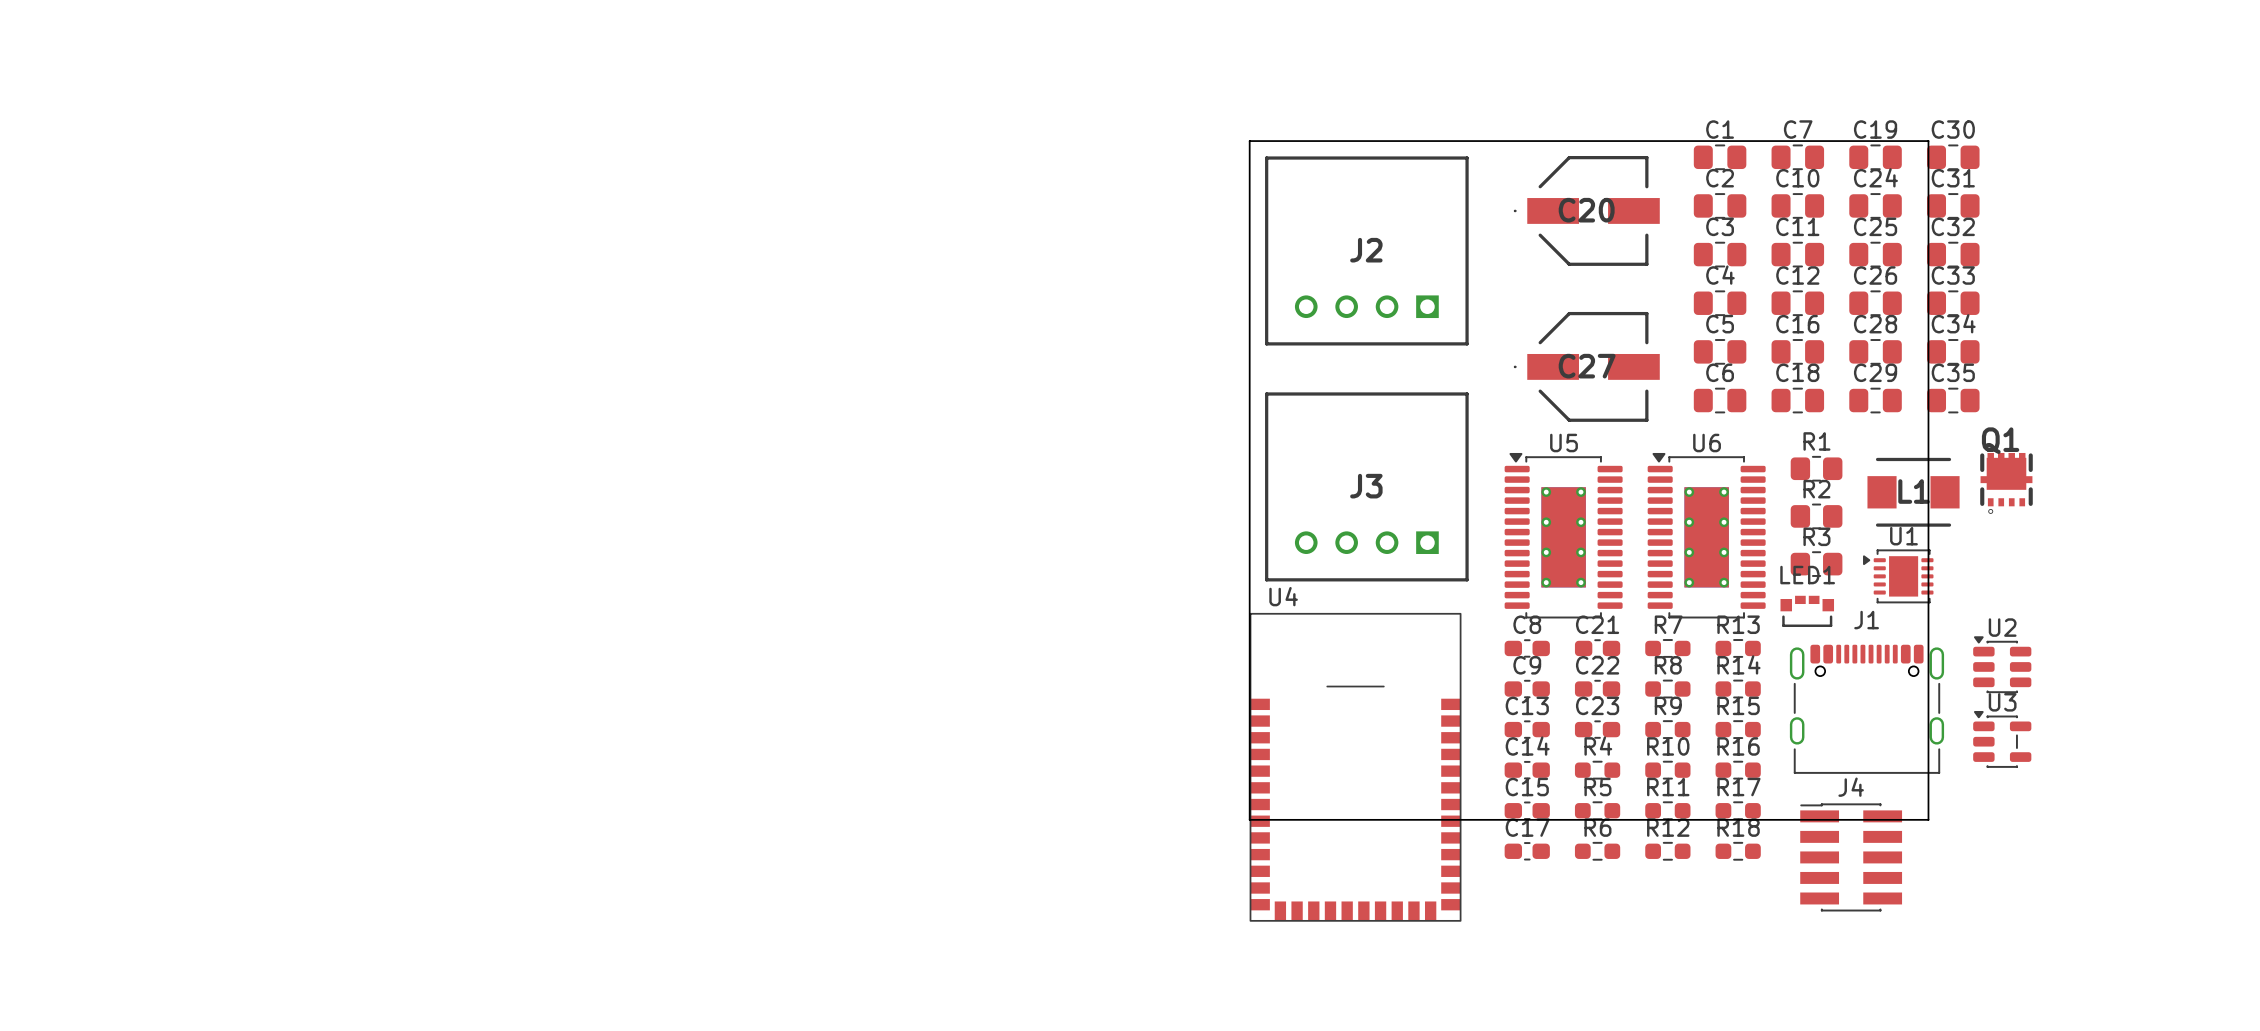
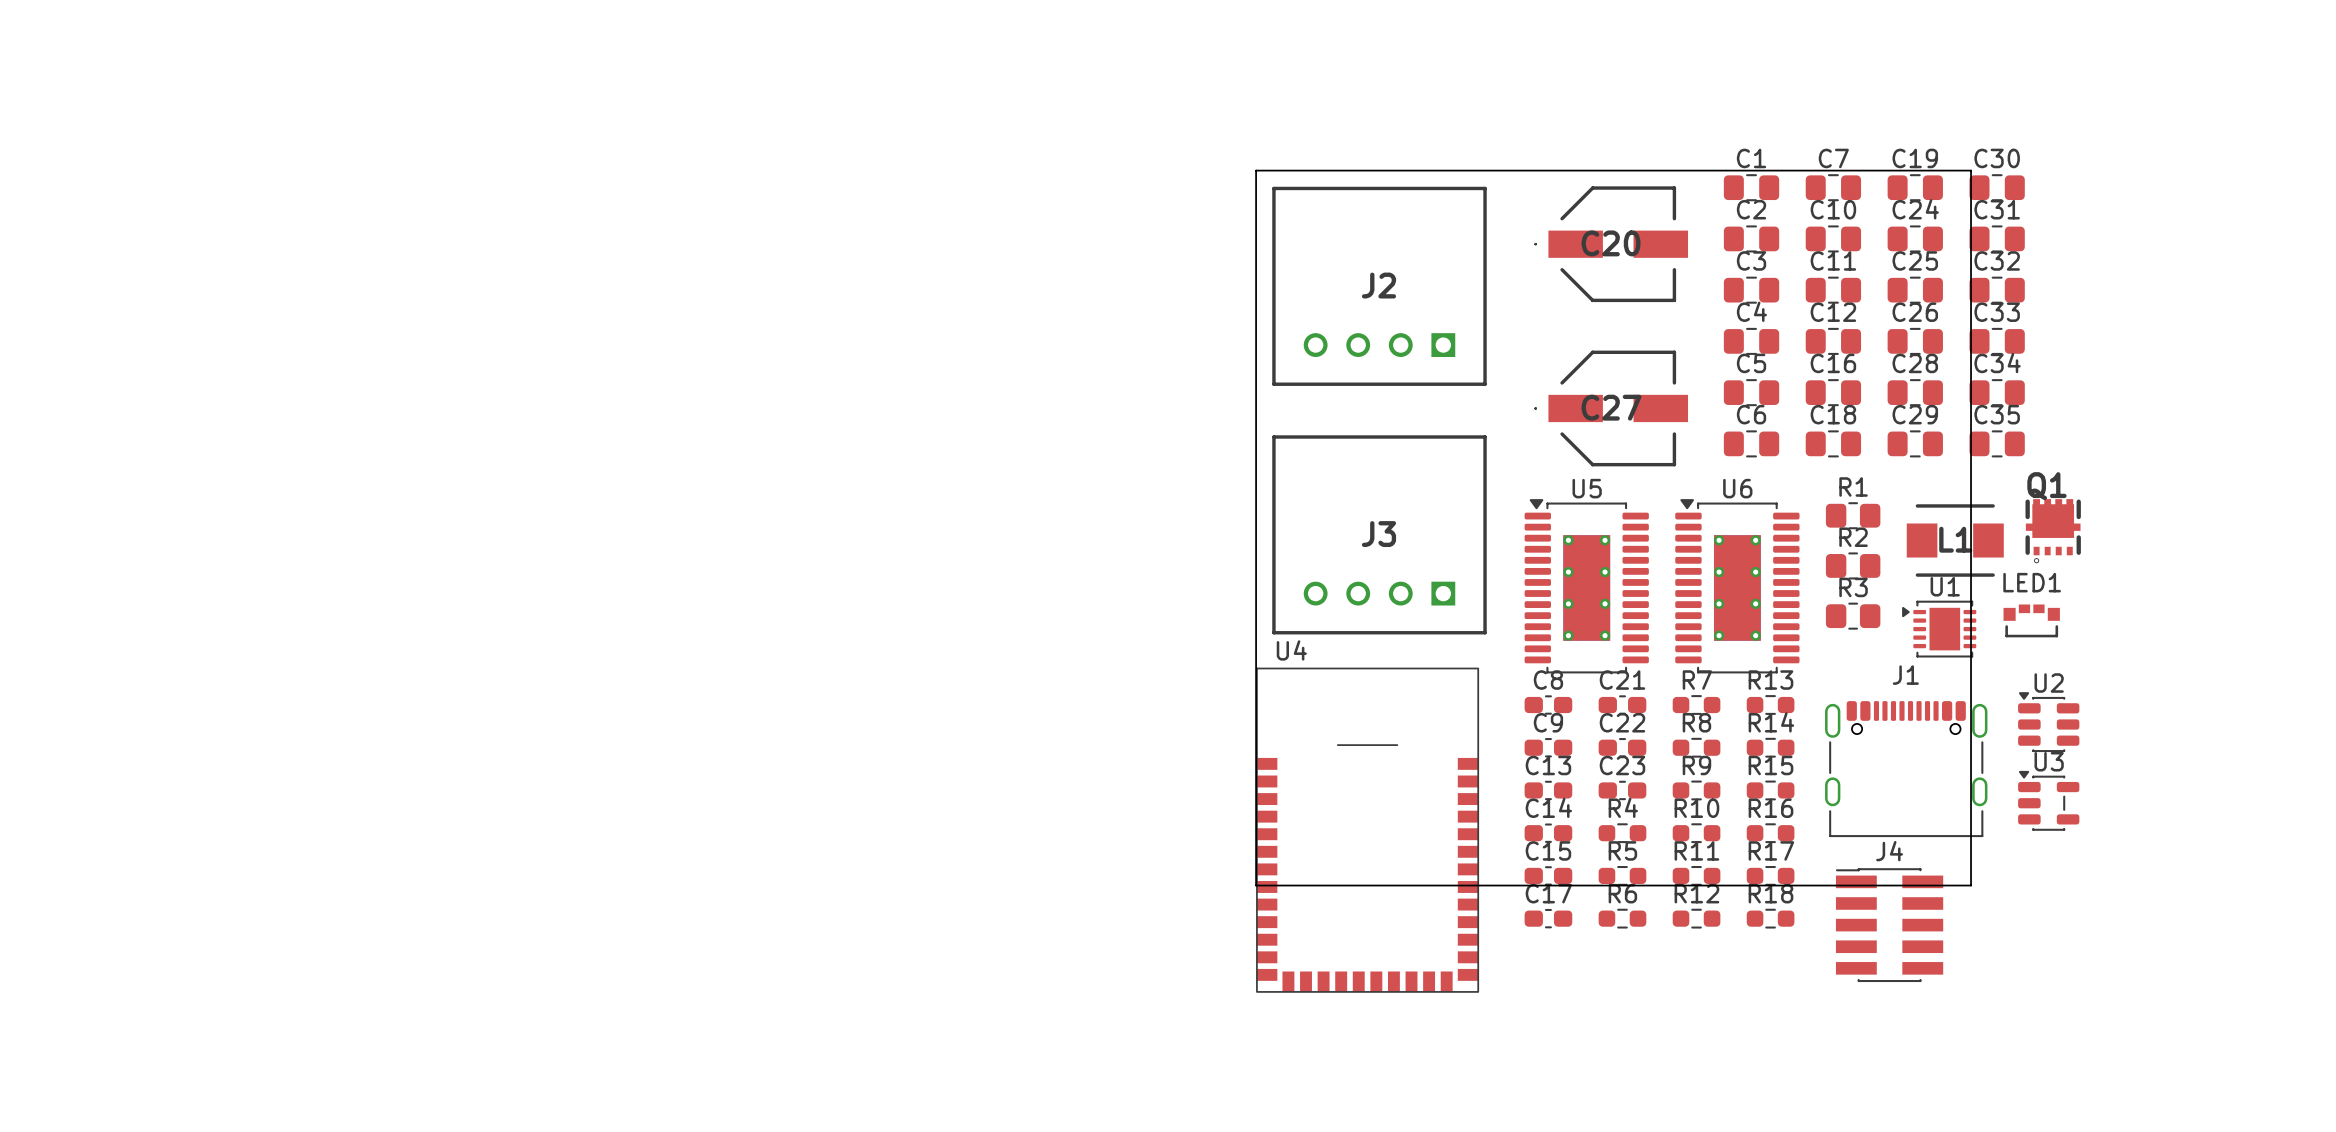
LED1 position: (1807, 611) -> (2031, 620)

